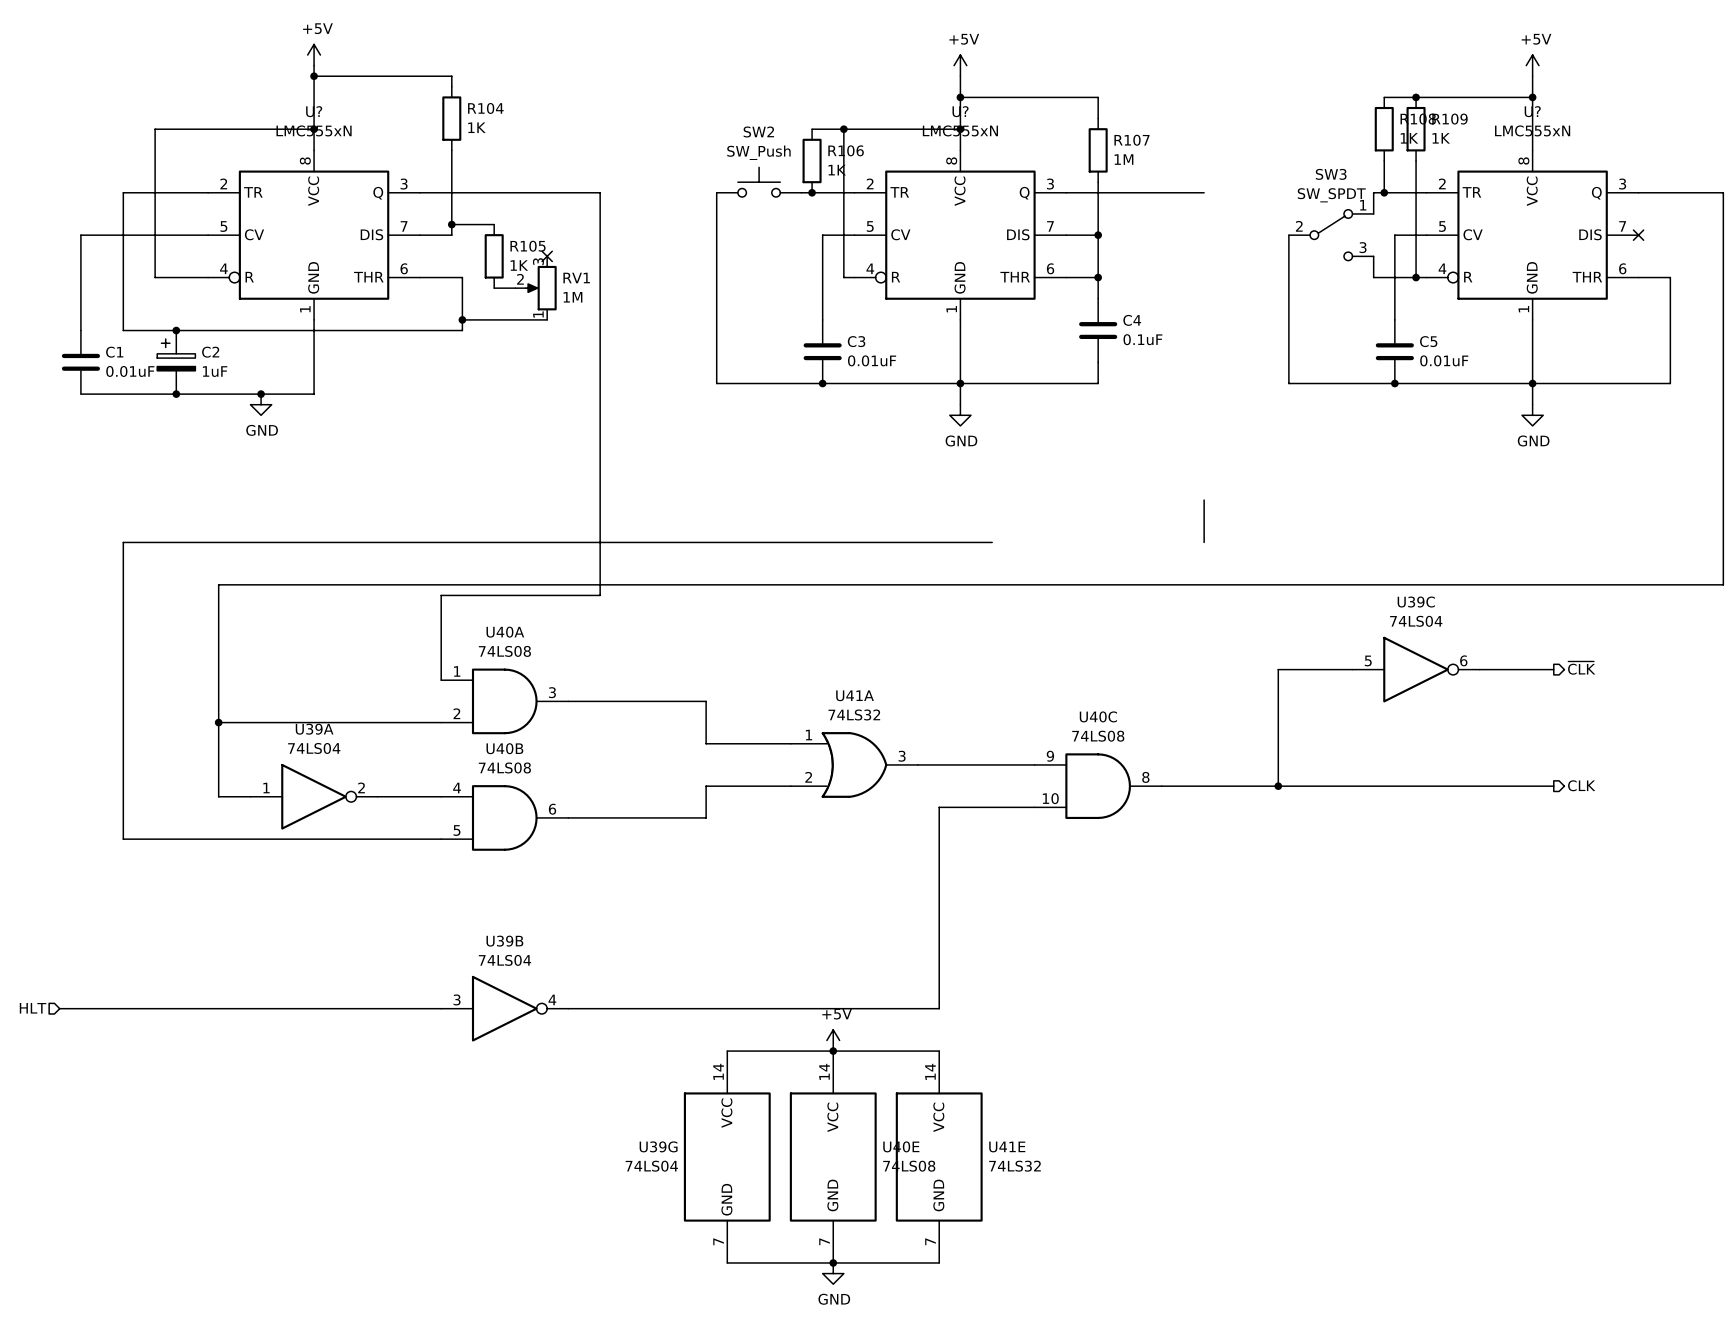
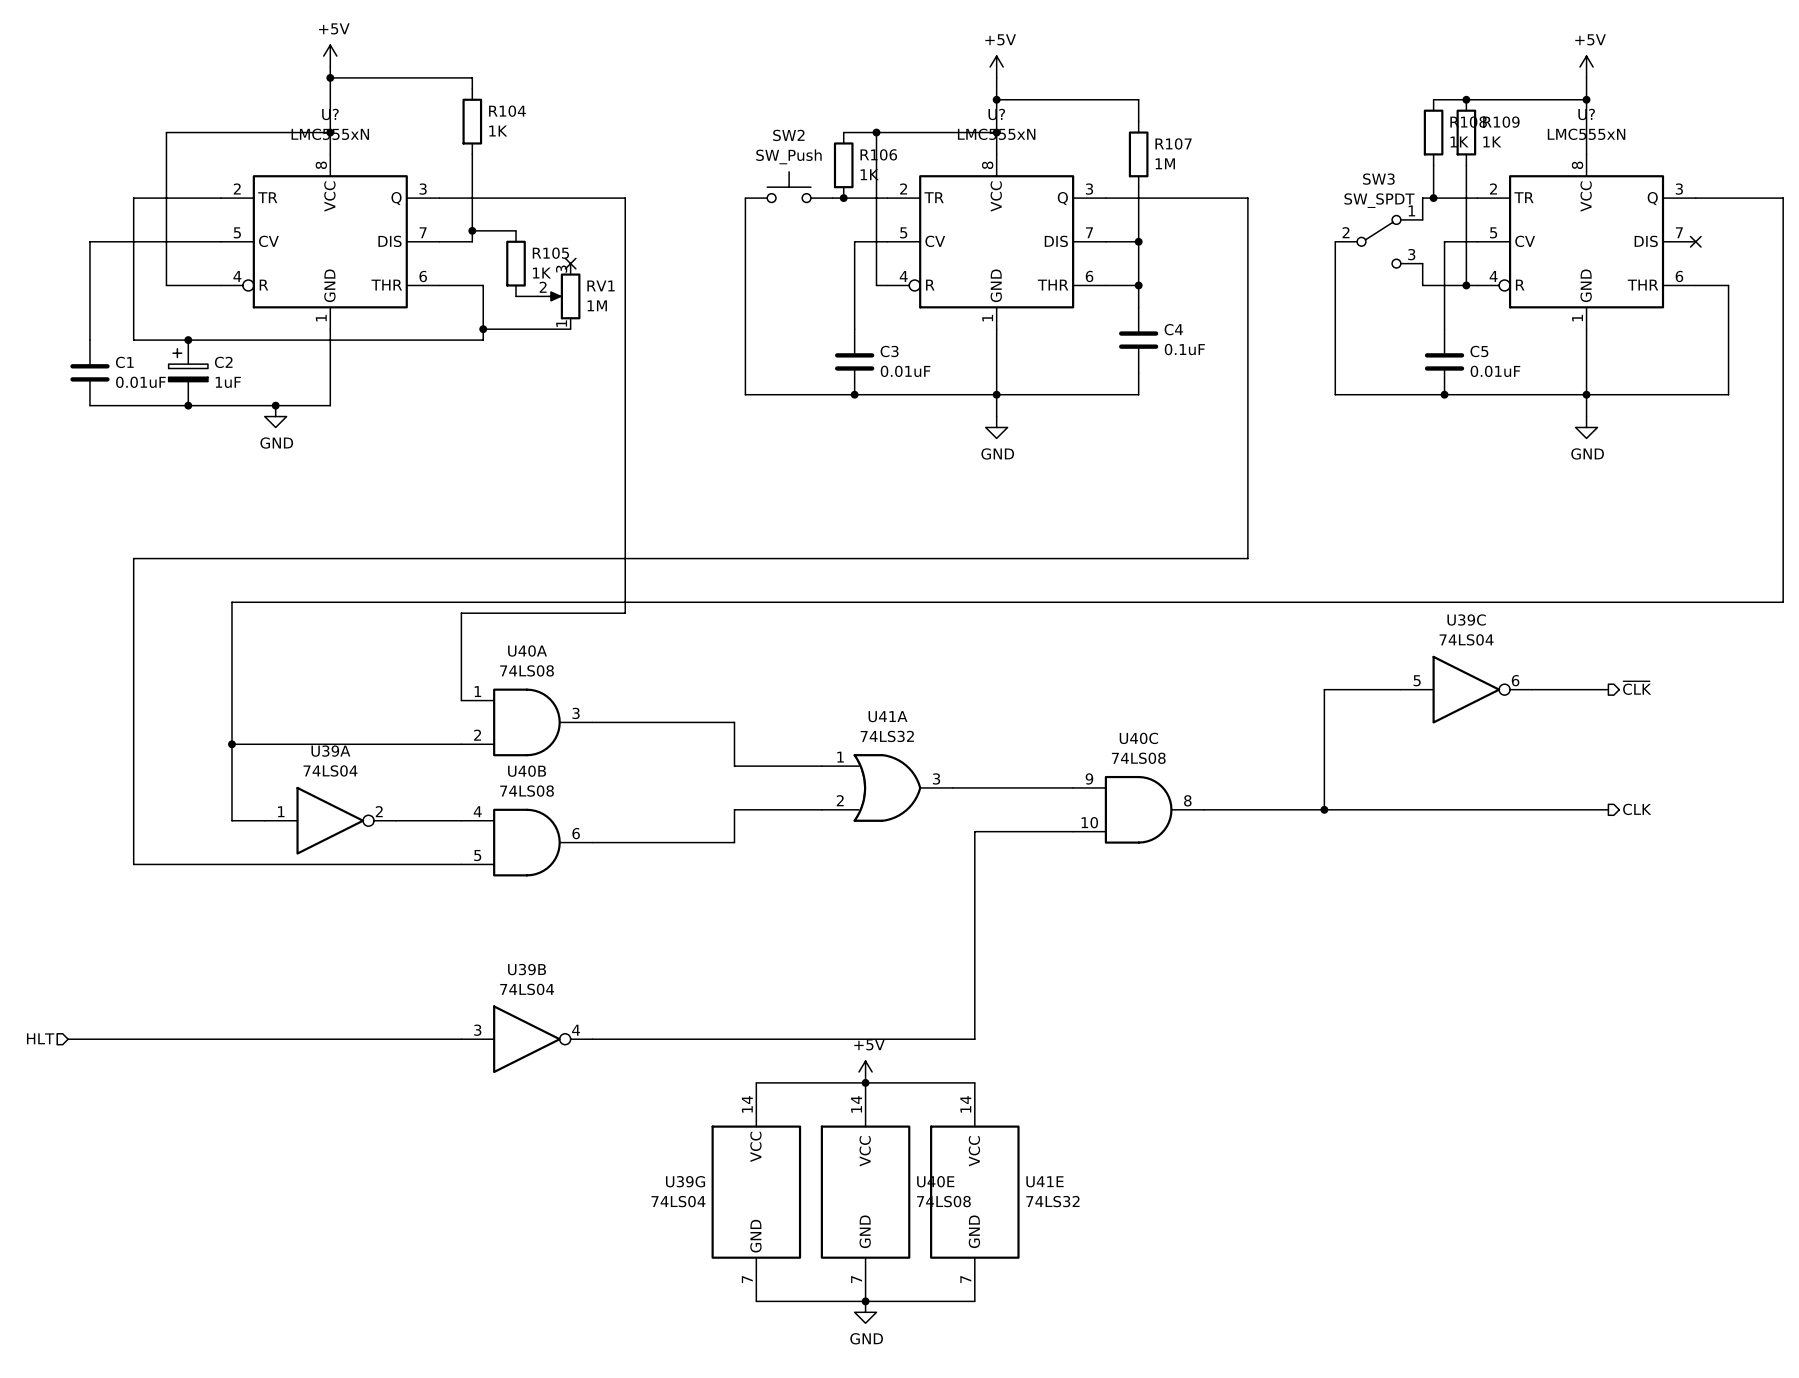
wire: none -> (1247, 198) (1247, 514)
wire: none -> (1029, 558) (1247, 558)

